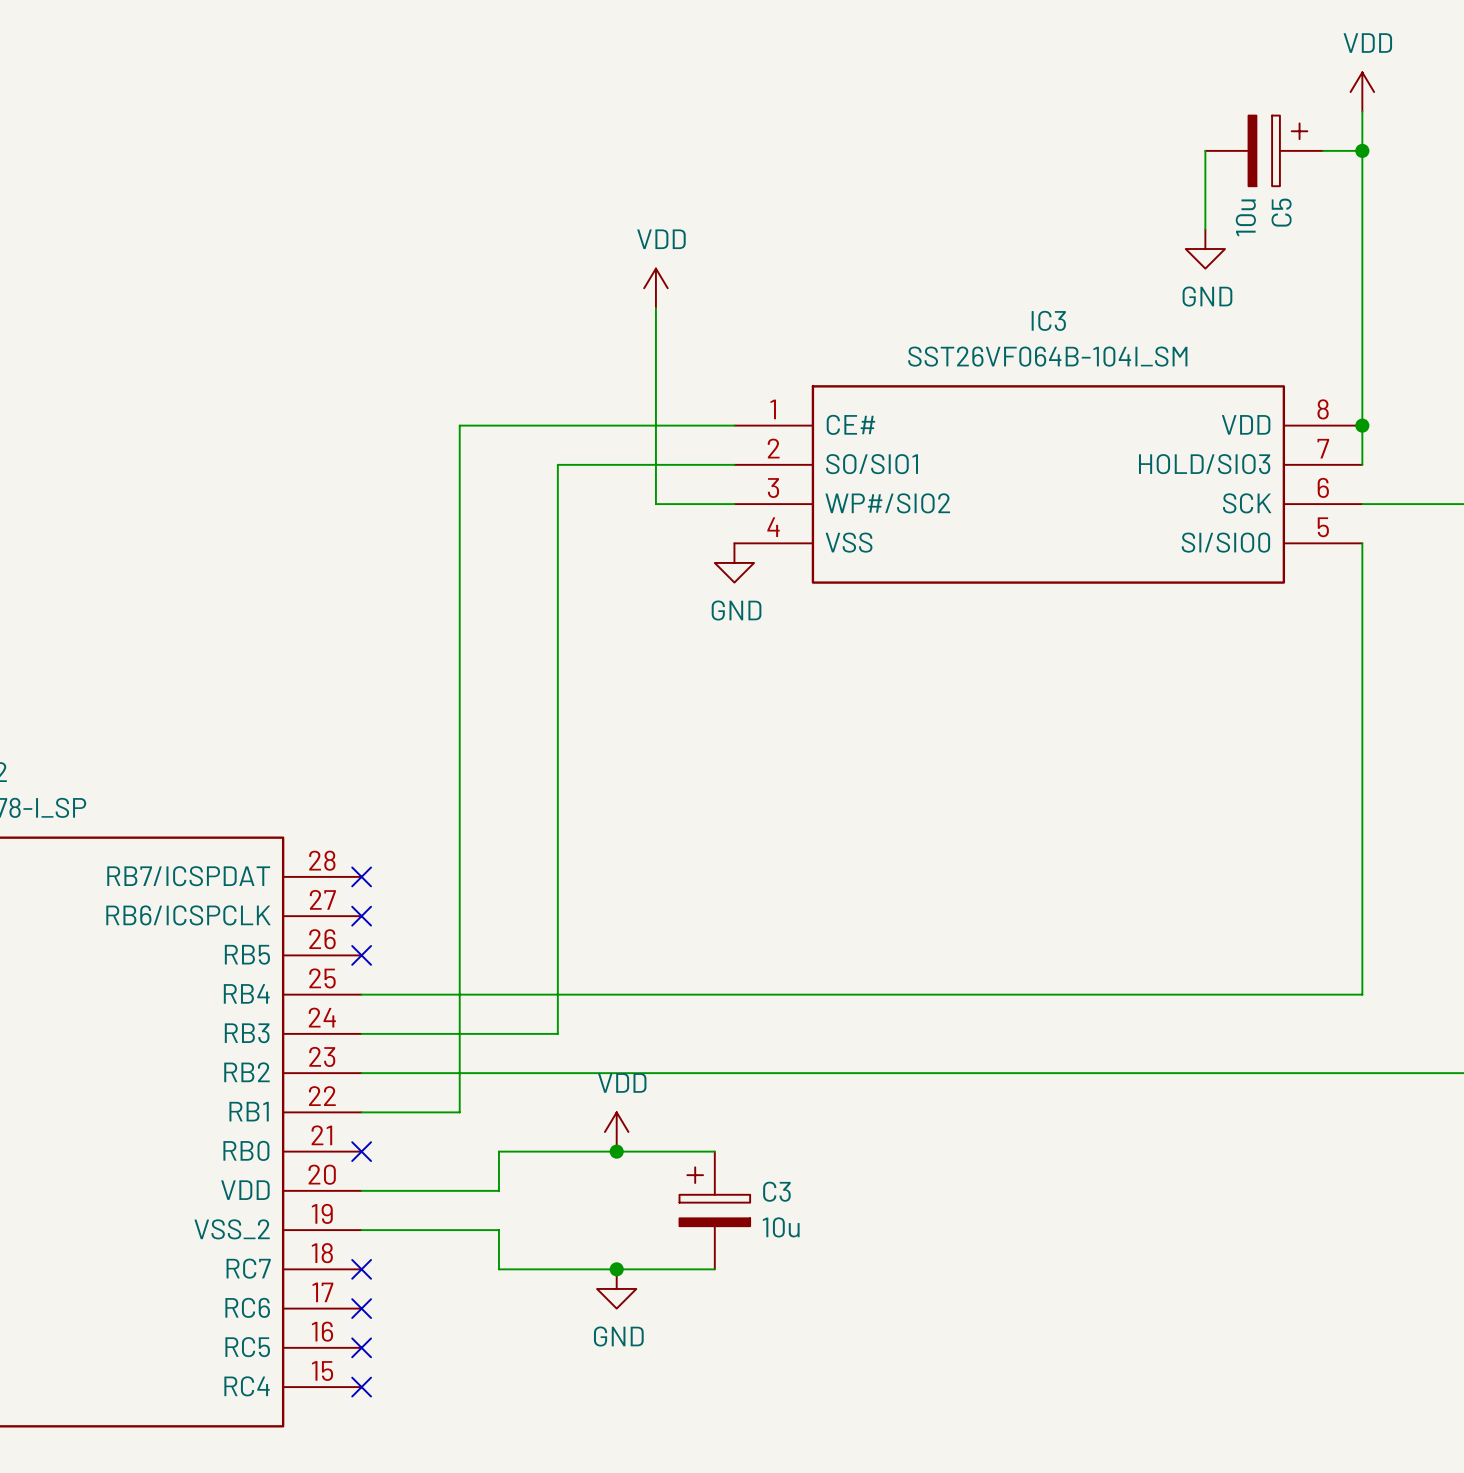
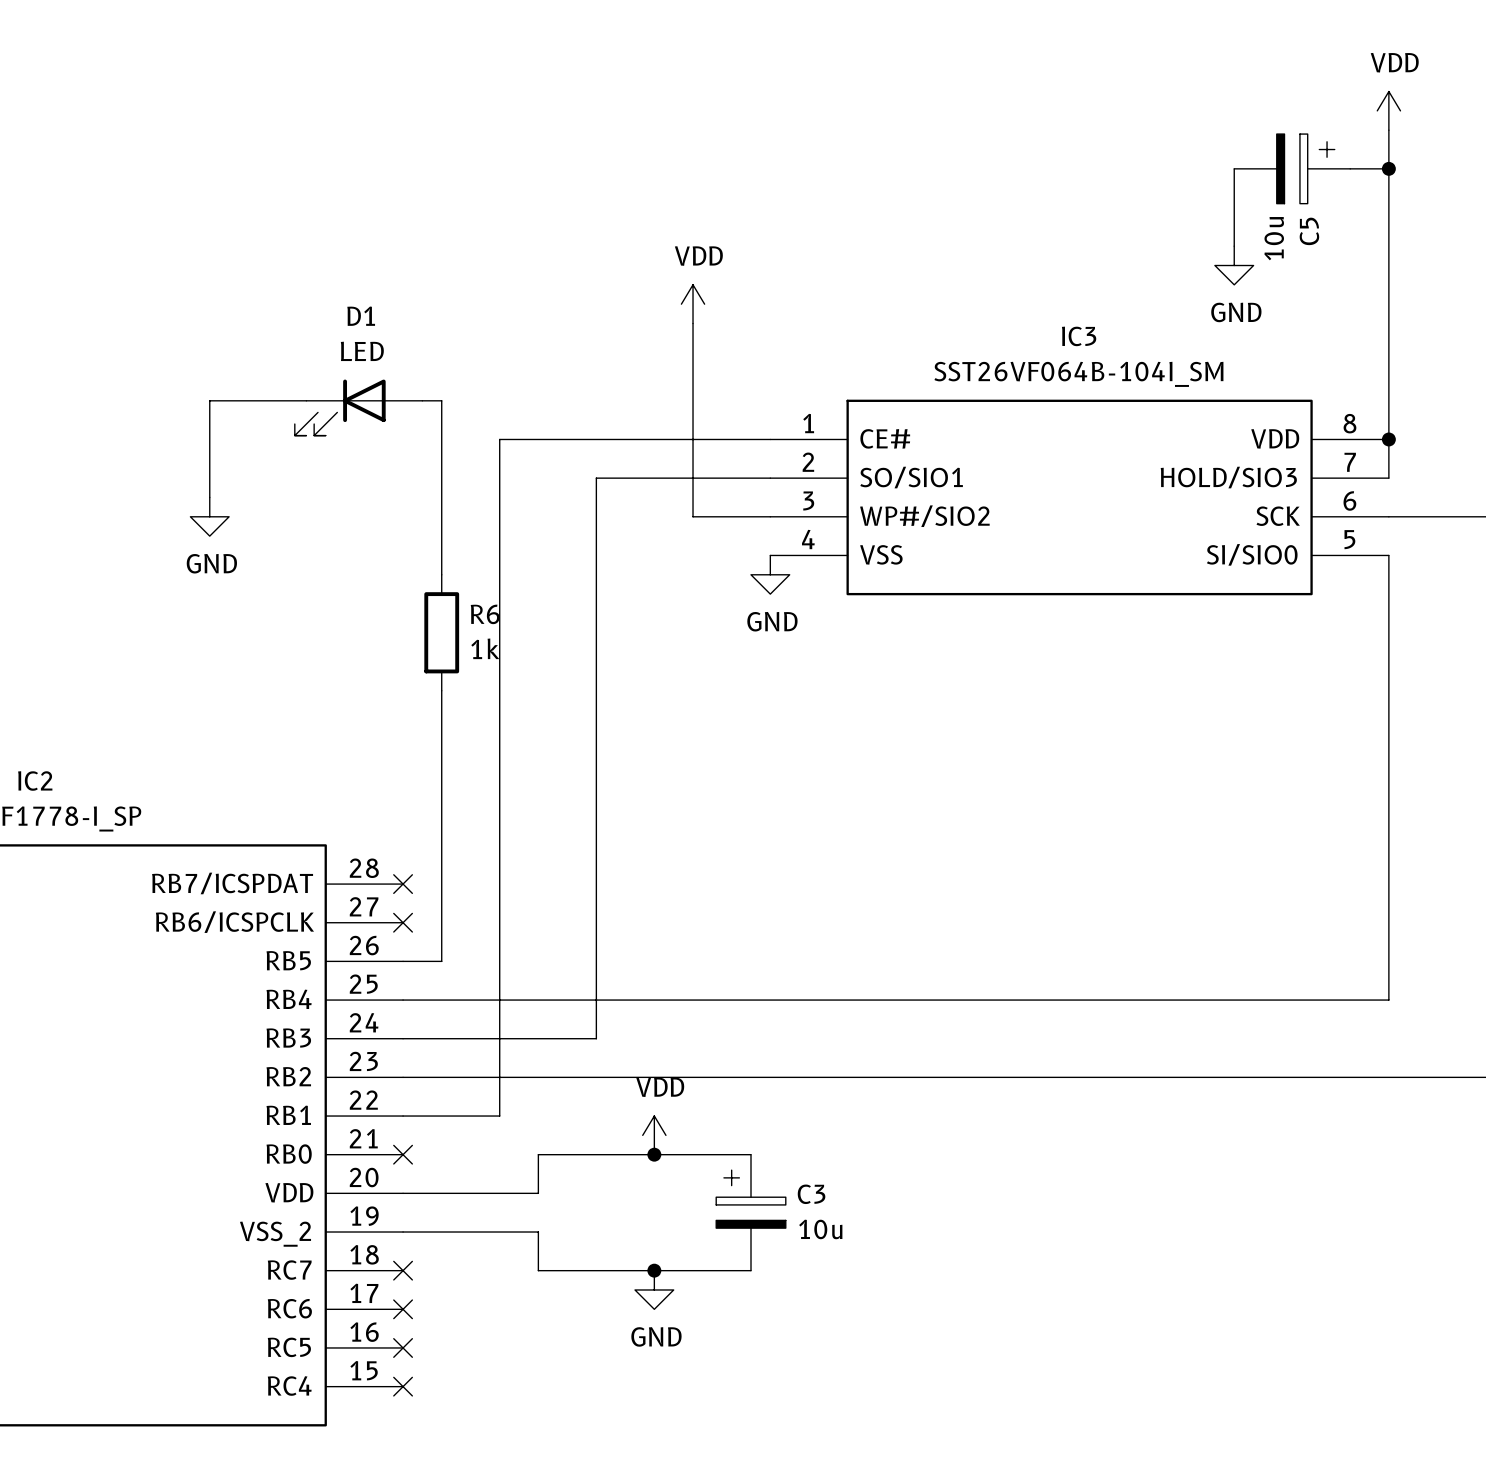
wire: none -> (306, 400) (209, 400) (209, 497)
wire: none -> (422, 400) (441, 400) (441, 574)
D1: none -> LED (358, 407)
power symbol: none -> GND (209, 516)
R6: none -> 1k (441, 632)
wire: none -> (441, 690) (441, 961) (403, 961)
no-connect mark: (361, 955) -> none

